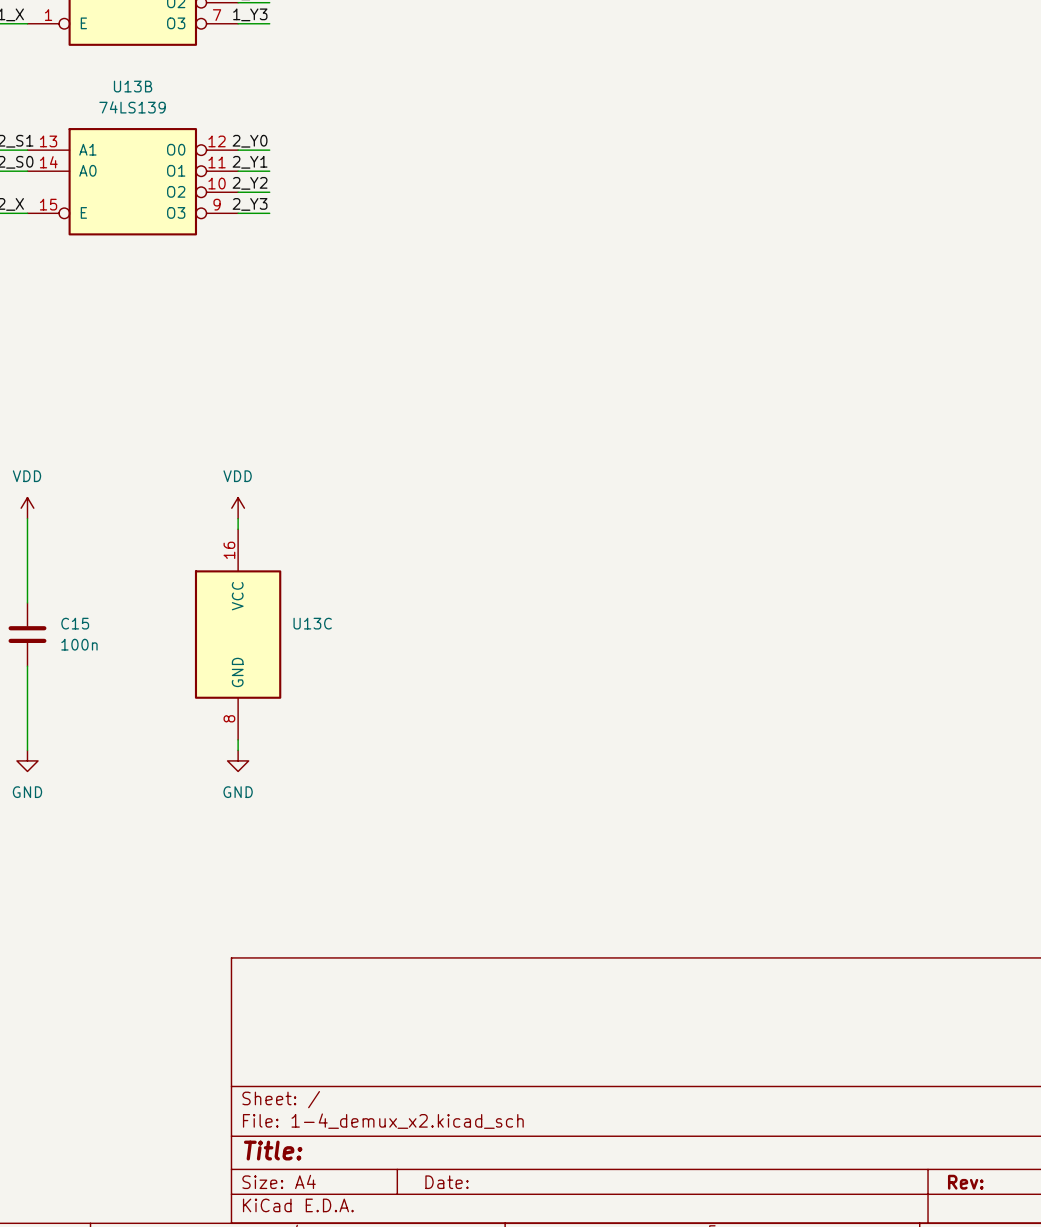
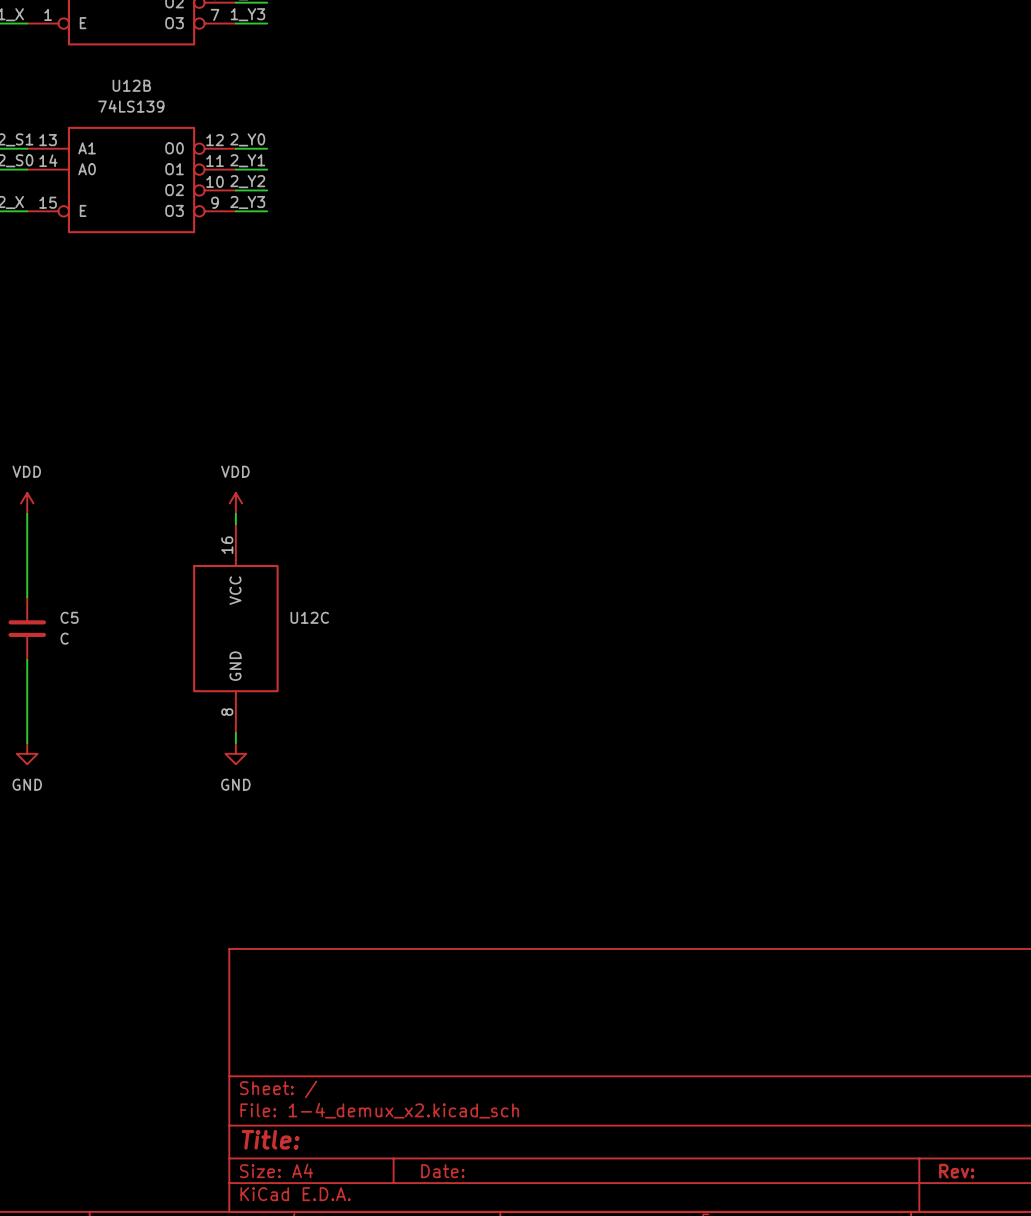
U13B name: U13B (133, 86) -> U12B (131, 85)
C15 name: C15 (75, 623) -> C5 (69, 617)
U13C name: U13C (312, 623) -> U12C (309, 617)
C15 value: 100n (79, 644) -> C (64, 638)

